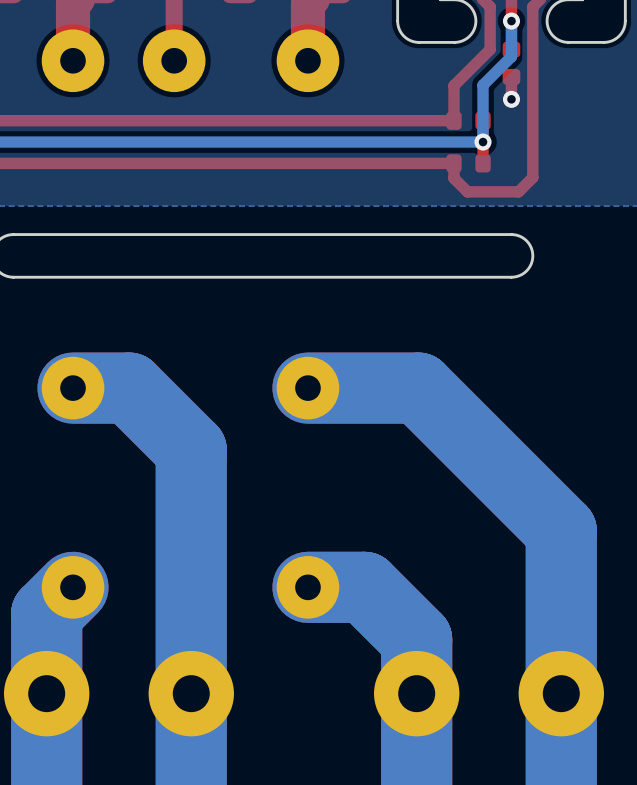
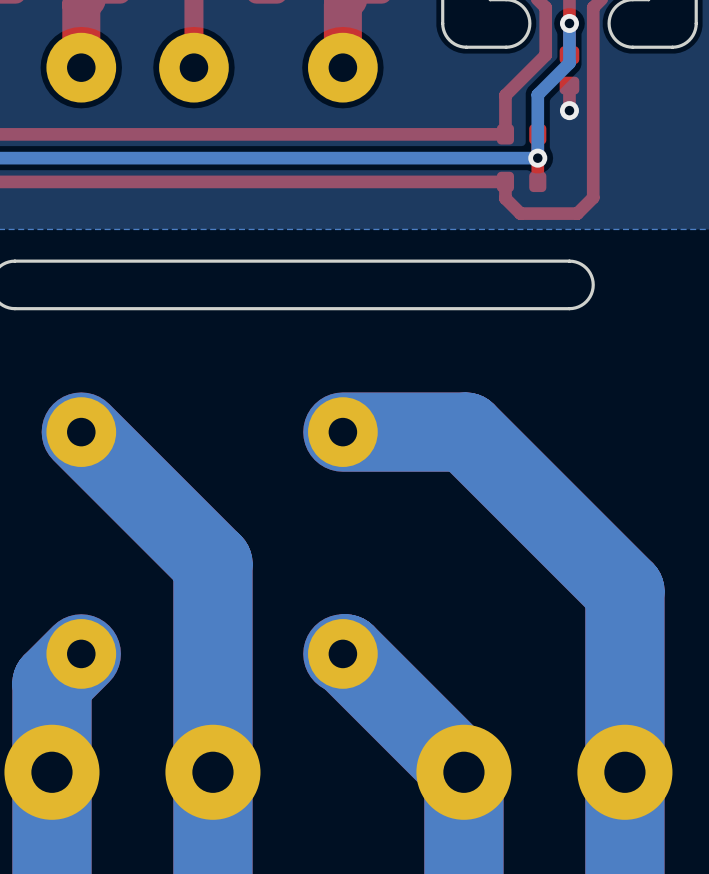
bottom track: (73, 388) (129, 388) (191, 450) (191, 506) -> (81, 432) (212, 563)
bottom track: (310, 587) (364, 587) (416, 639) (416, 693) -> (345, 653) (463, 772)

